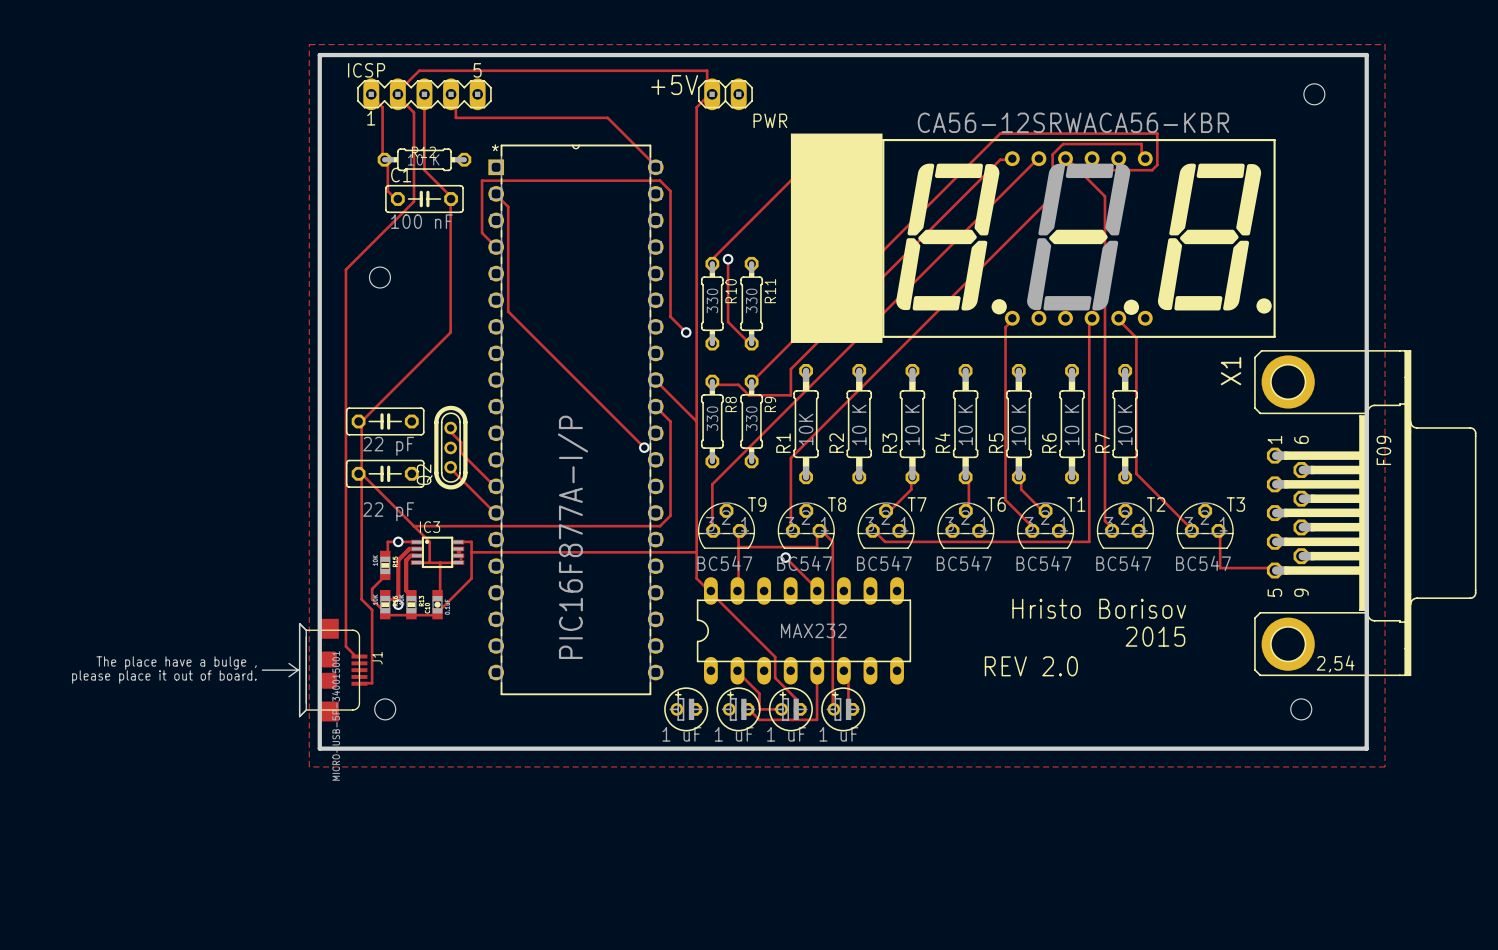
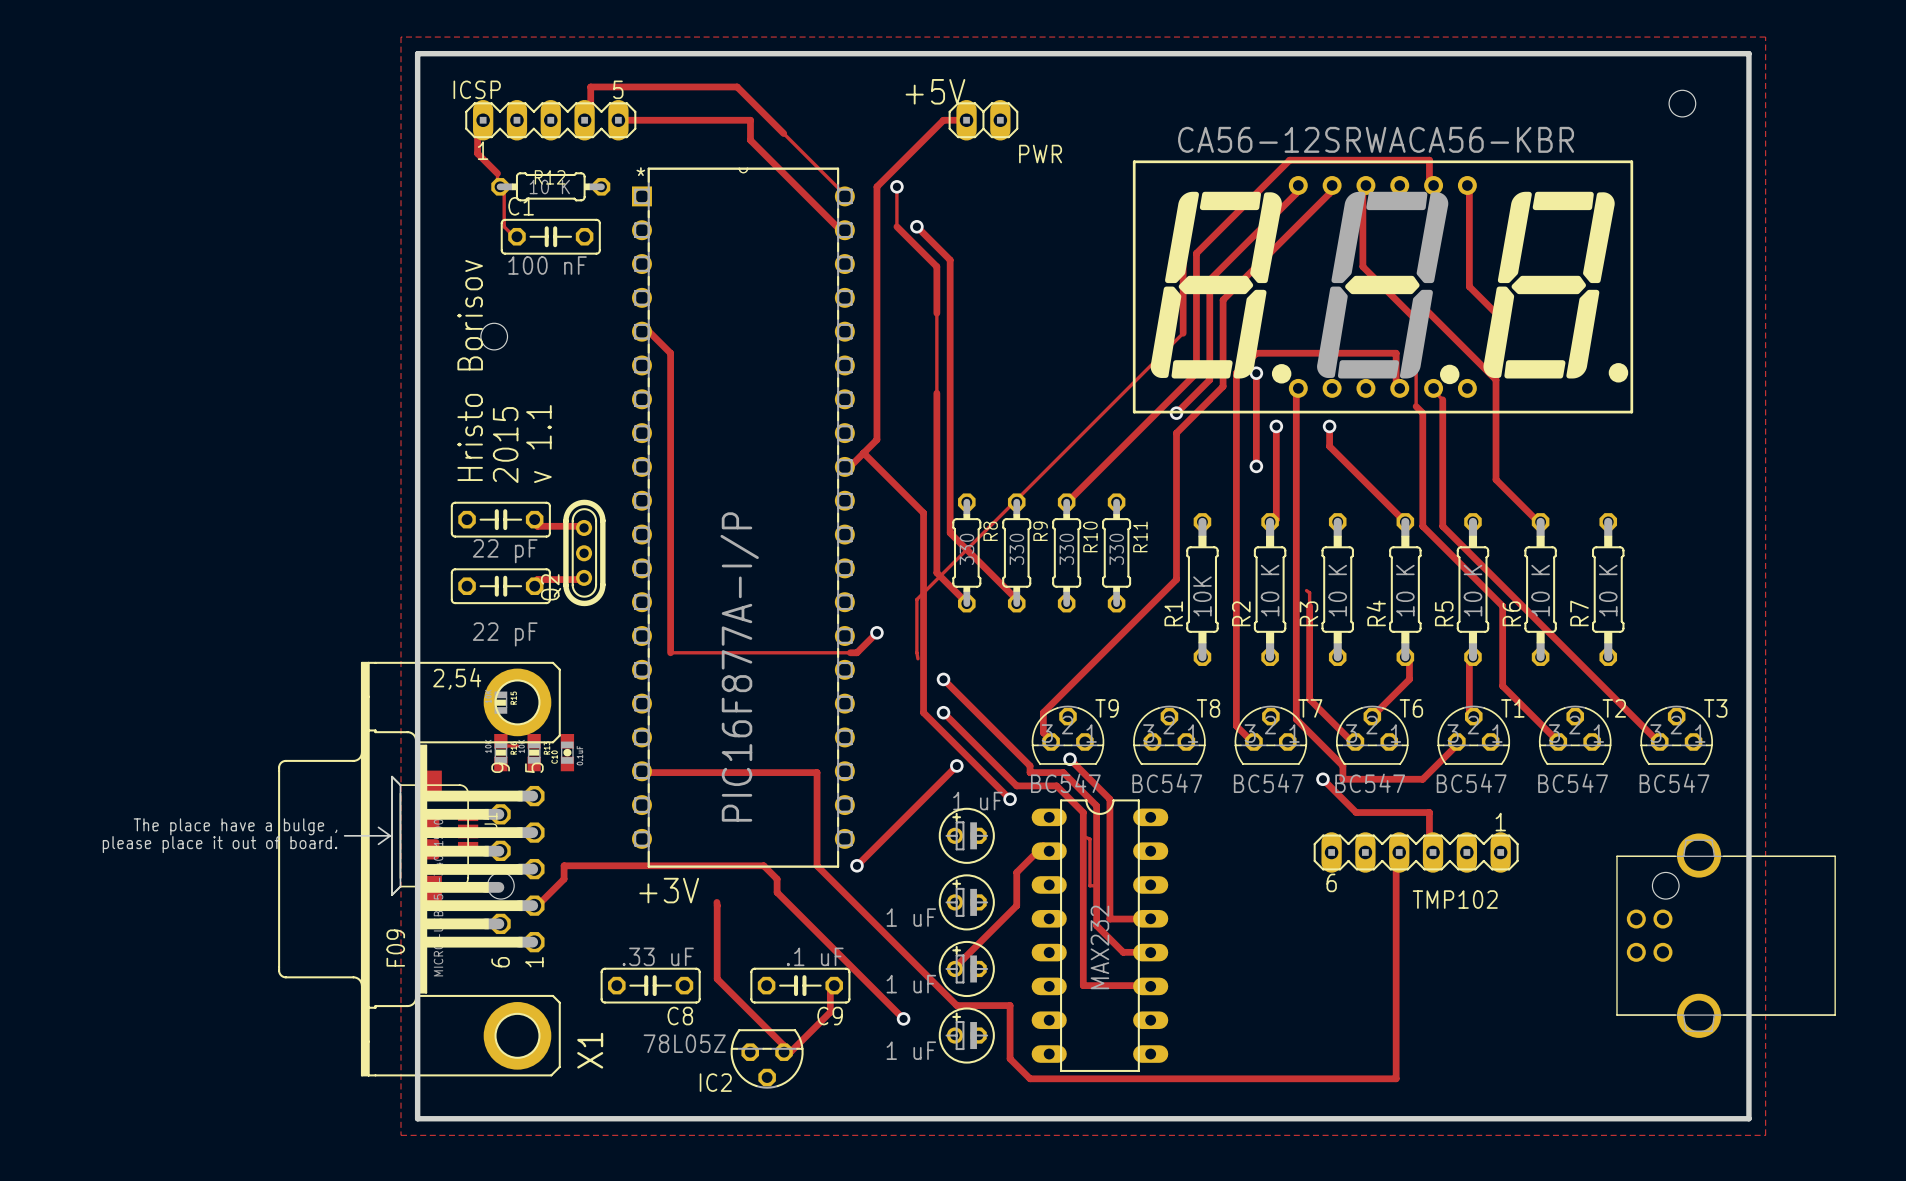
zone outline: (309, 44) (1385, 44) (1385, 766) (309, 766) (309, 44) -> (401, 37) (401, 1135) (1765, 1135) (1765, 37) (401, 37)
text position: +5V (674, 85) -> +5V (935, 91)
track: (371, 94) (382, 107) (382, 149) -> (483, 120) (477, 120) (477, 153) (497, 173)
track: (424, 94) (424, 170) (451, 199) (450, 332) (361, 421) -> none
ICSP position: (424, 94) -> (550, 120)
PWR position: (725, 94) -> (983, 120)
track: (455, 107) (455, 117) (607, 117) -> (590, 106) (590, 86) (737, 86) (783, 133)
track: none -> (618, 120) (750, 120) (750, 140) (843, 233) (844, 230)
drawing: [790, 133, 883, 343] -> none
track: (1065, 158) (1104, 196) (1104, 264) -> (1365, 185) (1362, 186) (1362, 266) (1416, 319)
track: (1092, 158) (1094, 159) (1094, 170) (1152, 170) (1157, 164) (1157, 133) (1000, 133) (751, 381) -> none
track: none -> (1433, 185) (1429, 180) (1429, 160) (1289, 160) (1196, 253) (1196, 373) (1066, 502)
track: (1145, 158) (1141, 154) (1141, 144) (1063, 144) (1052, 154) (1052, 196) (790, 458) (790, 484) -> (916, 226) (950, 260) (950, 532) (1016, 599)
track: none -> (1467, 185) (1469, 186) (1469, 286) (1502, 319)
track: (696, 159) (696, 107) (712, 94) (707, 91) (707, 70) (419, 70) (398, 91) (398, 96) (414, 112) (414, 201) (345, 269) (345, 646) (356, 657) (359, 656) -> none
via: none -> (896, 186)
track: (1010, 159) (1000, 159) (790, 369) (790, 395) (749, 395) (738, 384) (712, 384) (712, 381) -> (1296, 186) (1296, 193) (1209, 280) (1209, 379) (1176, 413)
track: (1036, 159) (921, 274) -> (1183, 226) (1183, 333)
track: none -> (1329, 186) (1329, 193) (1223, 299) (1223, 386) (1176, 433) (1176, 579) (1043, 712) (1043, 732) (1051, 741)
track: (801, 170) (712, 259) (712, 263) -> none
track: (696, 191) (696, 578) (775, 657) (775, 677) (796, 698) (796, 709) (800, 709) -> (896, 226) (936, 266) (936, 313)
via: none -> (916, 226)
track: (496, 193) (508, 206) (508, 311) (644, 447) -> none
track: (496, 247) (482, 233) (482, 180) (660, 180) (670, 191) (670, 316) (686, 332) -> none
track: none -> (1422, 306) (1496, 379) (1496, 479) (1535, 519) (1540, 521)
via: (728, 259) -> none
R10 position: (712, 303) -> (1066, 552)
R11 position: (751, 303) -> (1116, 552)
text: none -> Hristo Borisov (470, 370)
track: none -> (1256, 373) (1256, 466)
via: none -> (1256, 373)
track: (1092, 318) (1089, 322) (1089, 541) (885, 541) (872, 530) -> (1399, 388) (1396, 386) (1396, 353) (1256, 353) (1236, 373) (1236, 726) (1253, 741)
track: (728, 322) (751, 343) -> (936, 393) (936, 572) (966, 603)
track: (1010, 322) (1005, 327) (1005, 500) (1031, 526) (1032, 530) -> (1296, 393) (1296, 719) (1342, 765) (1342, 779) (1422, 779) (1456, 745) (1456, 741)
track: (1125, 327) (1136, 337) (1136, 473) (1191, 530) -> (1442, 399) (1442, 526) (1659, 741)
via: (686, 332) -> none
track: (1104, 332) (1104, 520) (1112, 530) -> (1416, 406) (1422, 413) (1422, 526) (1502, 606) (1502, 686) (1558, 741)
via: none -> (1176, 413)
track: none -> (1276, 426) (1276, 519) (1270, 521)
via: none -> (1276, 426)
track: none -> (1329, 426) (1329, 446) (1405, 521)
via: none -> (1329, 426)
X1 footprint: [1254, 350, 1477, 677] -> [278, 661, 561, 1077]
text: none -> 2015 (505, 445)
text: none -> v 1.1 (538, 444)
track: none -> (863, 453) (923, 512) (923, 712) (1010, 799)
X1 name position: X1 (1231, 371) -> X1 (590, 1050)
via: none -> (1256, 466)
track: (655, 380) (696, 421) -> (844, 466) (850, 466) (876, 439) (876, 186) (943, 120) (966, 120)
track: (655, 406) (670, 421) (670, 515) (660, 526) -> (876, 632) (856, 652) (850, 652)
track: (361, 421) (361, 599) (372, 609) (372, 683) (359, 683) -> none
R8 position: (712, 421) -> (966, 552)
R9 position: (751, 421) -> (1016, 552)
R1 position: (806, 424) -> (1202, 589)
R2 position: (859, 424) -> (1270, 589)
R3 position: (912, 424) -> (1337, 589)
R4 position: (965, 424) -> (1405, 589)
R5 position: (1018, 424) -> (1472, 589)
R6 position: (1072, 424) -> (1540, 589)
R7 position: (1125, 424) -> (1608, 589)
track: (450, 428) (450, 431) (461, 442) (461, 452) (496, 486) -> (584, 527) (584, 526) (537, 526) (537, 519) (534, 519)
via: (644, 447) -> none
track: (450, 468) (496, 512) -> (584, 579) (537, 579) (537, 586) (534, 586)
track: (358, 473) (361, 473) (429, 541) (429, 562) -> none
track: (912, 477) (911, 489) (890, 510) (886, 510) -> none
track: (965, 477) (968, 479) (968, 510) (965, 510) -> none
track: (790, 487) (790, 526) (792, 530) -> none
track: (1021, 489) (1042, 510) (1045, 510) -> (1309, 606) (1309, 699) (1349, 739) (1355, 741)
via: none -> (876, 632)
T9 position: (726, 525) -> (1067, 735)
T8 position: (806, 525) -> (1169, 735)
T7 position: (886, 525) -> (1270, 735)
T6 position: (965, 525) -> (1372, 735)
T1 position: (1045, 525) -> (1473, 735)
T2 position: (1125, 525) -> (1575, 735)
T3 position: (1205, 525) -> (1676, 735)
track: (414, 526) (518, 526) -> (641, 331) (643, 326) (670, 353) (670, 652)
track: none -> (1405, 657) (1409, 659) (1409, 679) (1372, 716)
track: none -> (1472, 657) (1469, 659) (1469, 712) (1473, 716)
track: (739, 530) (737, 590) -> none
track: (1218, 530) (1220, 531) (1220, 568) (1272, 568) (1274, 570) -> none
via: (398, 541) -> none
track: (416, 542) (387, 541) (387, 552) (385, 556) -> none
track: (459, 542) (471, 541) (471, 578) (434, 615) (385, 613) (372, 599) (372, 588) (385, 574) -> none
track: none -> (943, 679) (1030, 765) (1030, 772) (1063, 772) (1096, 805) (1096, 925) (1123, 952) (1150, 952)
via: none -> (943, 679)
track: (738, 547) (817, 547) (817, 531) (819, 530) (832, 541) (833, 709) -> none
track: (416, 548) (409, 548) (398, 560) (398, 604) -> none
track: (459, 548) (461, 562) (416, 562) -> none
IC3: (437, 552) -> none
track: (471, 552) (696, 552) -> none
track: (416, 555) (410, 555) (406, 560) (406, 590) (411, 595) -> none
track: (785, 557) (817, 590) -> none
via: (785, 557) -> none
track: (440, 562) (440, 594) (437, 595) -> none
track: none -> (943, 712) (1016, 785) (1056, 785) (1083, 812) (1083, 985) (1150, 986)
via: none -> (943, 712)
via: (398, 604) -> none
text: Hristo Borisov (1099, 608) -> none
track: none -> (1069, 759) (1109, 799) (1109, 919) (1150, 918)
via: none -> (1069, 759)
track: none -> (956, 765) (856, 865)
via: none -> (956, 765)
track: none -> (641, 771) (817, 772) (817, 865) (956, 1005) (1010, 1005) (1010, 1058) (1030, 1078) (1396, 1078) (1396, 852) (1399, 852)
track: none -> (1322, 779) (1356, 812) (1429, 812) (1429, 852) (1433, 852)
via: none -> (1322, 779)
part rotation: 0° (803, 630) -> 90° clockwise (1099, 935)
part position: (803, 630) -> (1099, 935)
text: 2015 (1155, 636) -> none
via: none -> (1010, 799)
text: REV 2.0 (1031, 666) -> none
track: (737, 670) (759, 693) (759, 709) (781, 709) -> none
part: none -> 1 uF (966, 835)
track: (817, 670) (817, 719) (759, 719) (747, 709) -> none
track: none -> (1049, 851) (1043, 845) (1016, 872) (1016, 905) (954, 968)
TMP102: none -> (1416, 852)
via: none -> (856, 865)
part: 1 uF (686, 709) -> none
part position: (738, 709) -> (966, 902)
part: 1 uF (790, 709) -> none
part: 1 uF (843, 709) -> none
text: none -> +3V (669, 890)
track: none -> (716, 902) (717, 978) (783, 1045) (783, 1052) (790, 1052) (830, 1012) (830, 985) (834, 985)
track: none -> (534, 905) (537, 905) (564, 879) (564, 865) (763, 865) (777, 879) (777, 892) (903, 1018)
part value position: 1 uF (734, 734) -> 1 uF (911, 917)
board edge: (319, 748) (1366, 748) -> (417, 935) (417, 1118) (1748, 1118) (1748, 935)
part: none -> (1726, 935)
part: none -> 1 uF (966, 968)
C8: none -> .33 uF (650, 985)
C9: none -> .1 uF (800, 985)
via: none -> (903, 1018)
part: none -> 1 uF (966, 1035)
IC2: none -> 78L05Z (767, 1058)

